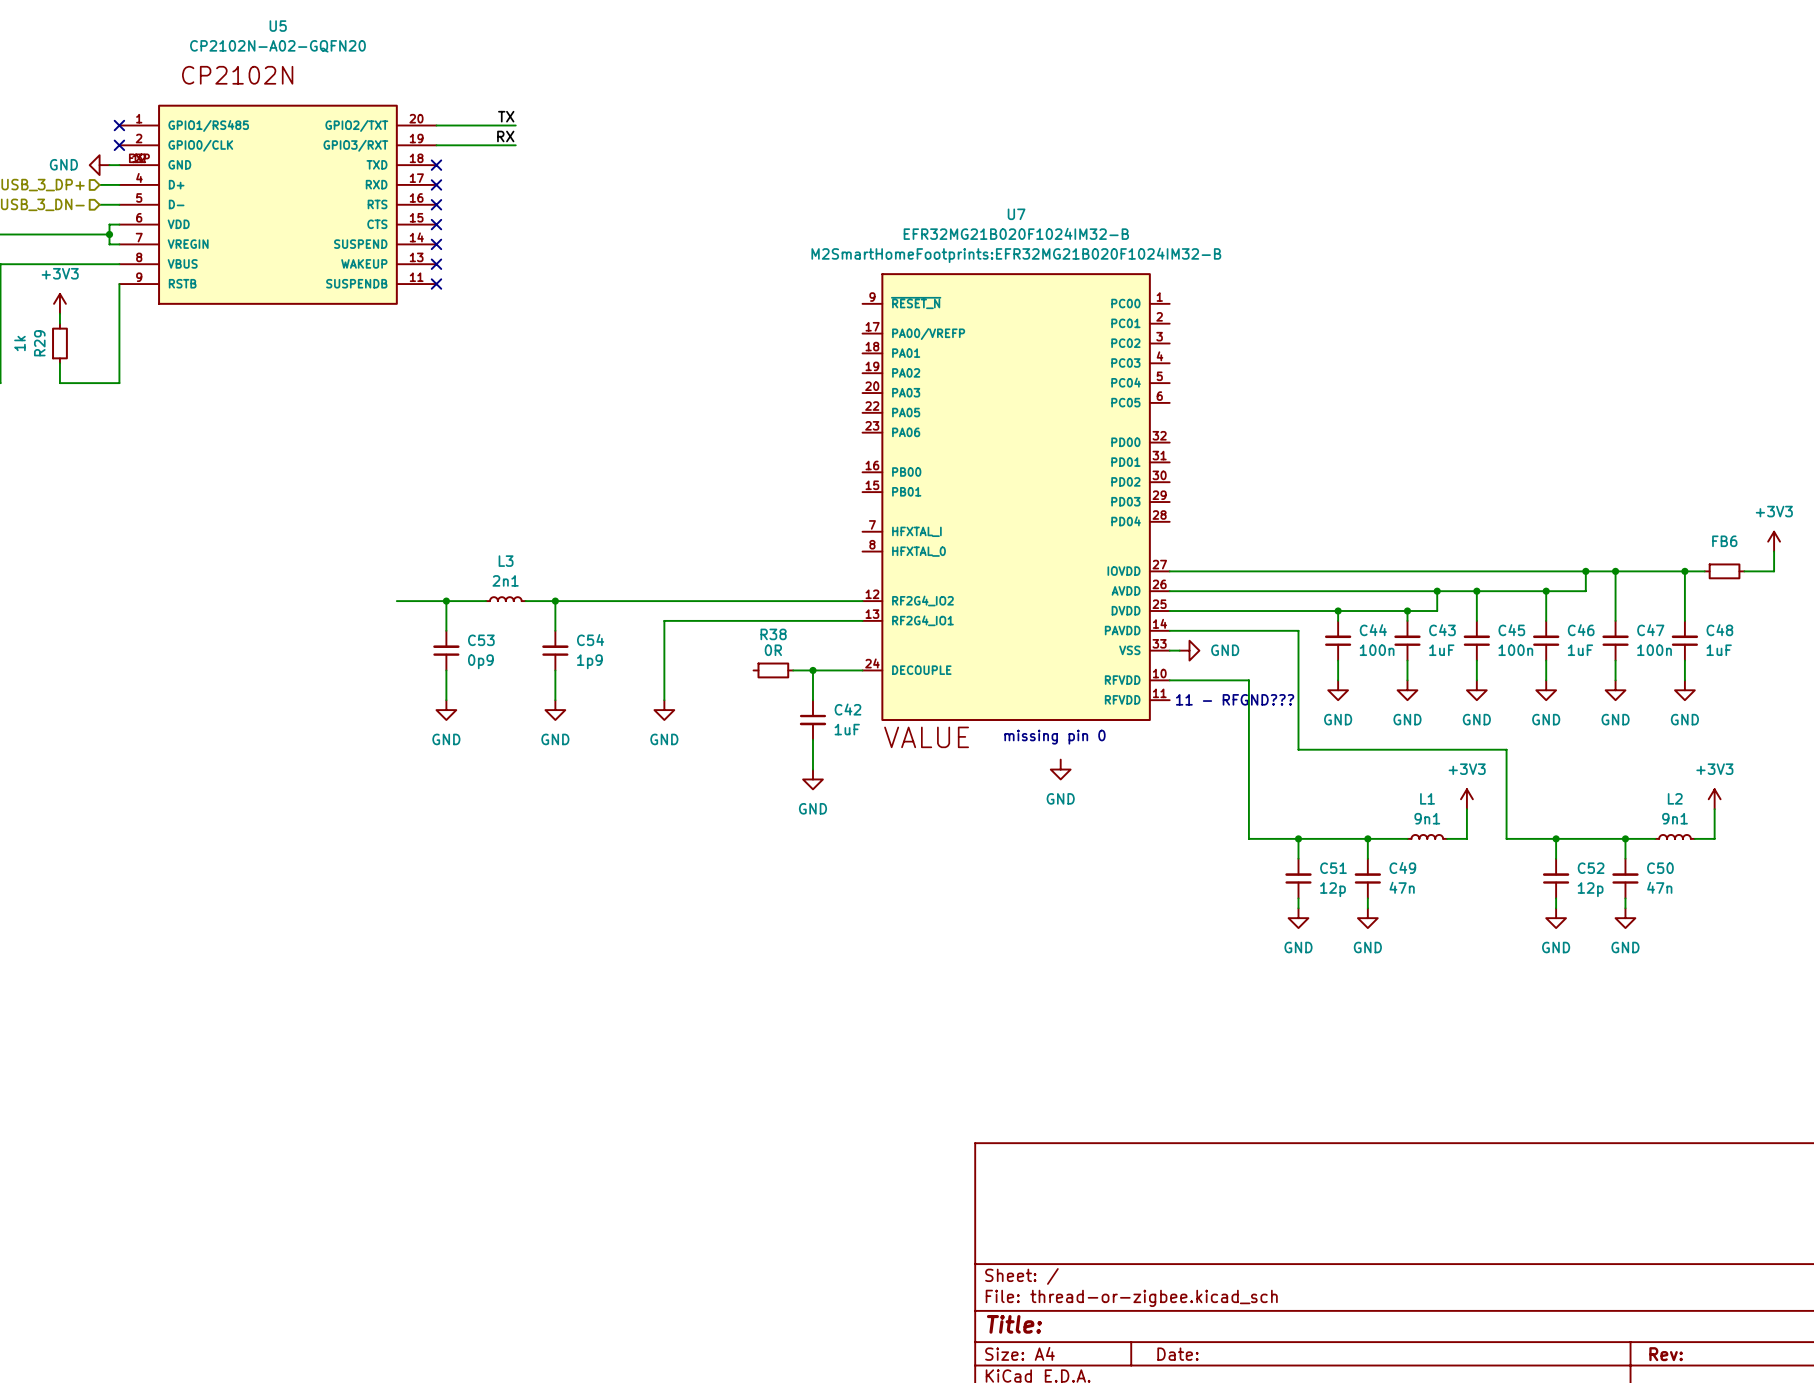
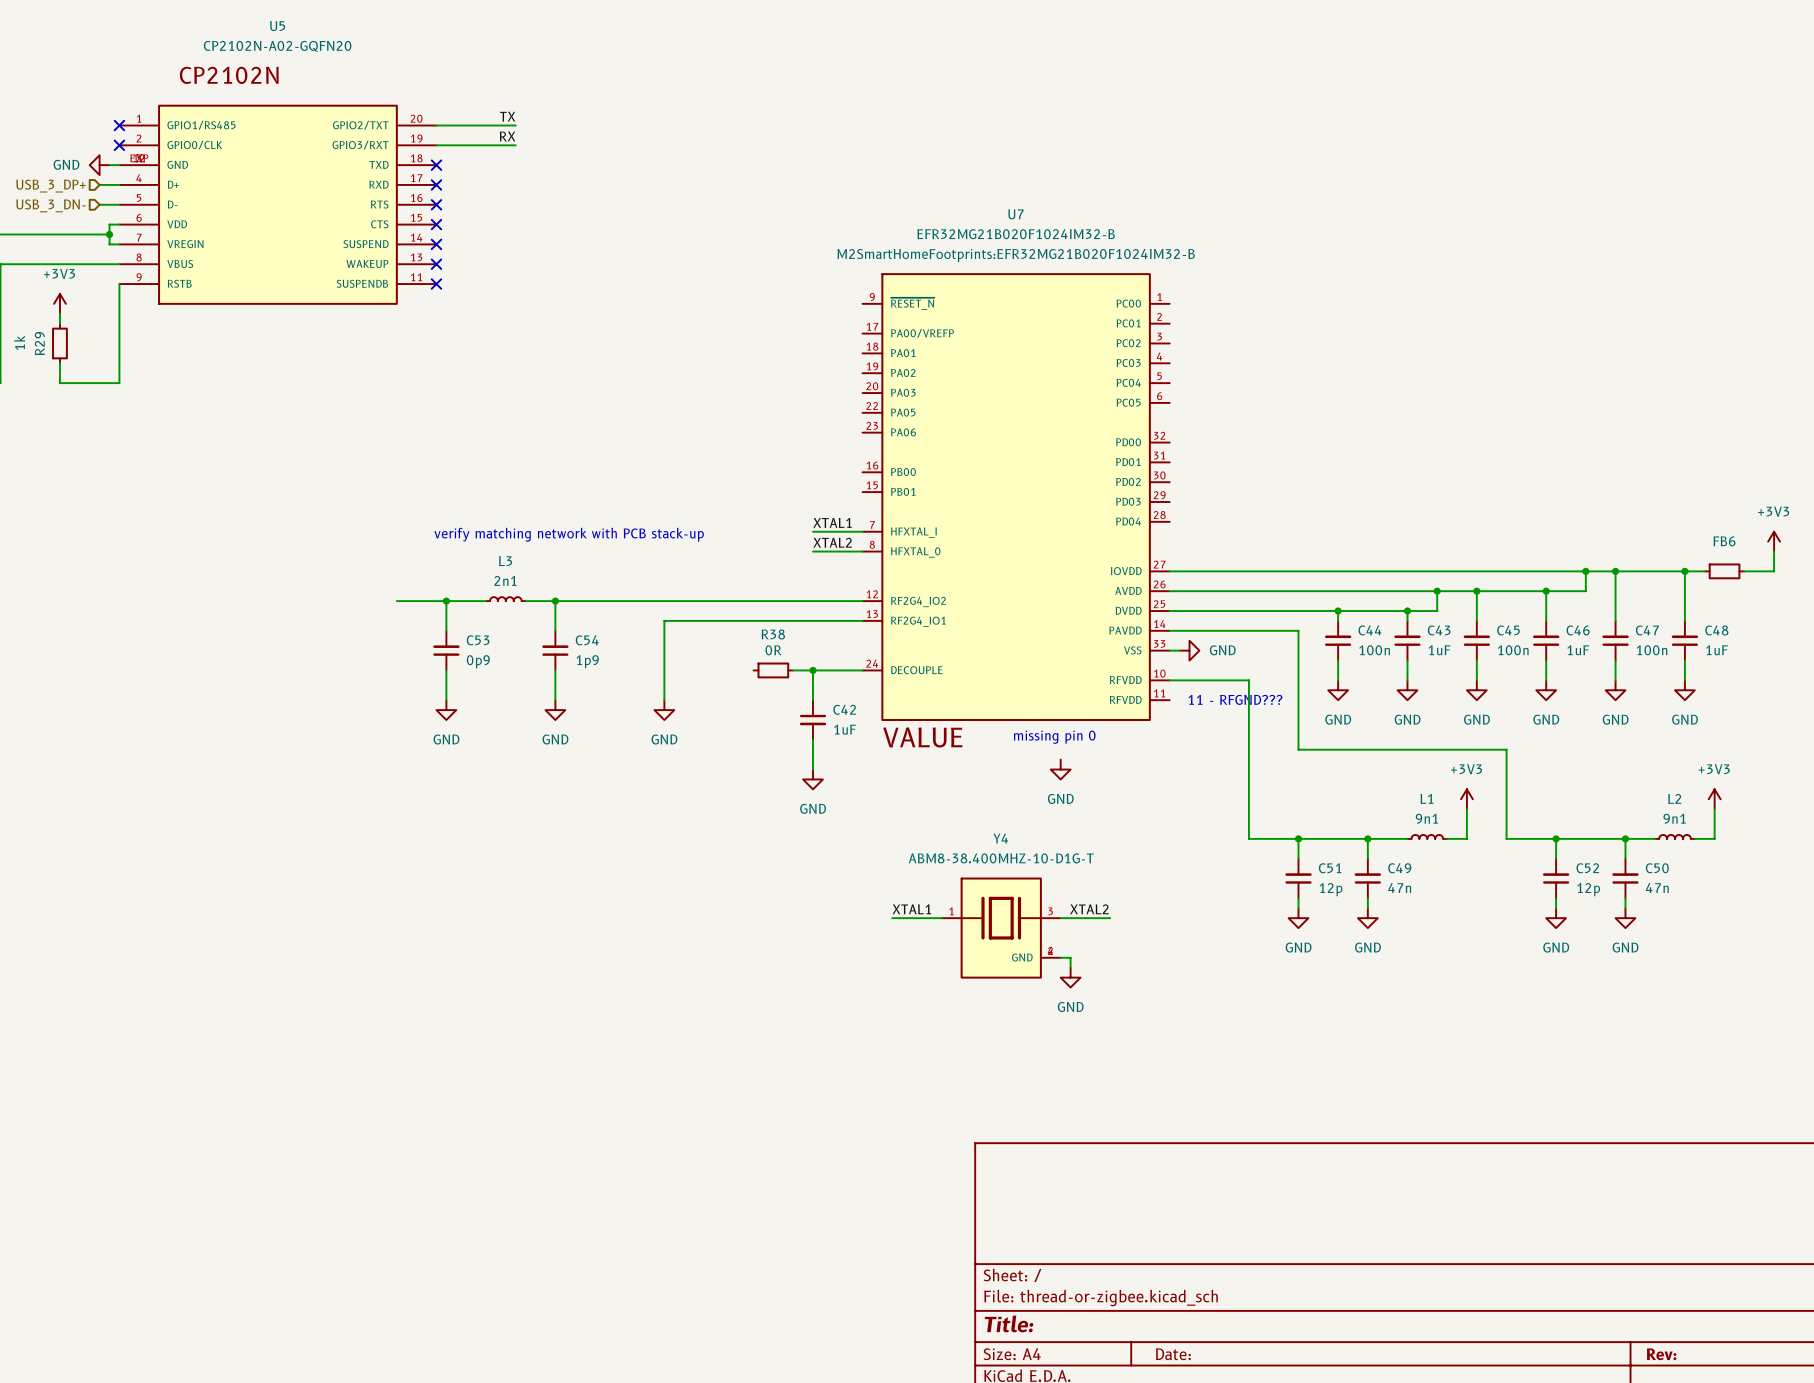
label: none -> XTAL1 (832, 522)
wire: none -> (812, 531) (862, 531)
text: none -> verify matching network with PCB stack-up (569, 534)
label: none -> XTAL2 (832, 542)
wire: none -> (812, 551) (862, 551)
label: none -> XTAL1 (911, 909)
label: none -> XTAL2 (1089, 909)
wire: none -> (892, 918) (941, 918)
wire: none -> (1060, 918) (1110, 918)
Y4: none -> ABM8-38.400MHZ-10-D1G-T (1001, 928)
wire: none -> (1060, 957) (1070, 957) (1070, 967)
power symbol: none -> GND (1070, 977)

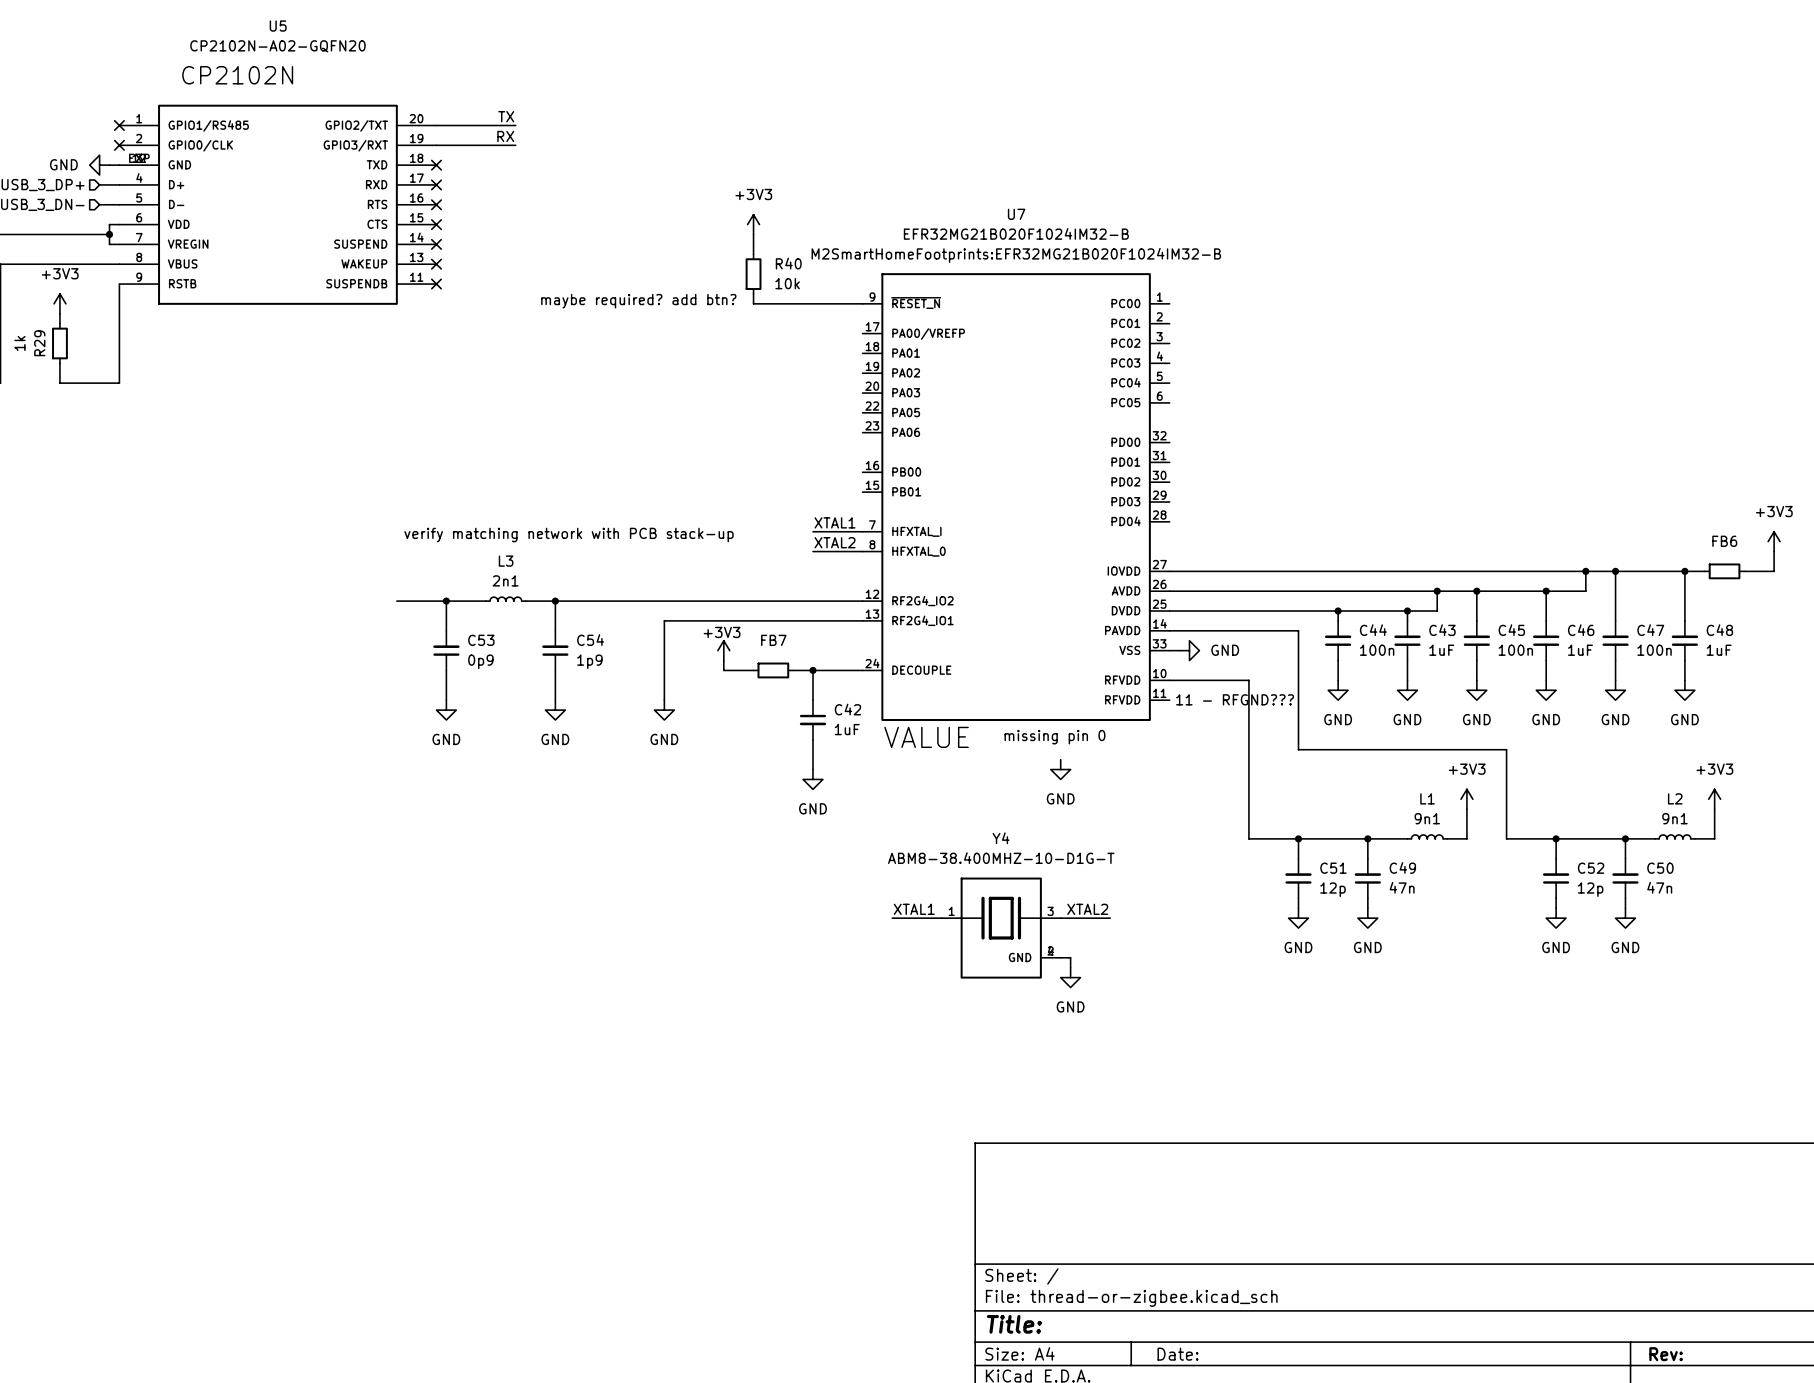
power symbol: none -> +3V3 (753, 224)
wire: none -> (753, 234) (753, 254)
R40: none -> (753, 274)
wire: none -> (753, 293) (753, 303) (862, 303)
text: none -> maybe required? add btn? (638, 301)
R38 name: R38 (773, 634) -> FB7 (773, 640)
power symbol: none -> +3V3 (723, 650)
R38 text: 0R (773, 650) -> none
wire: none -> (723, 660) (723, 670) (753, 670)

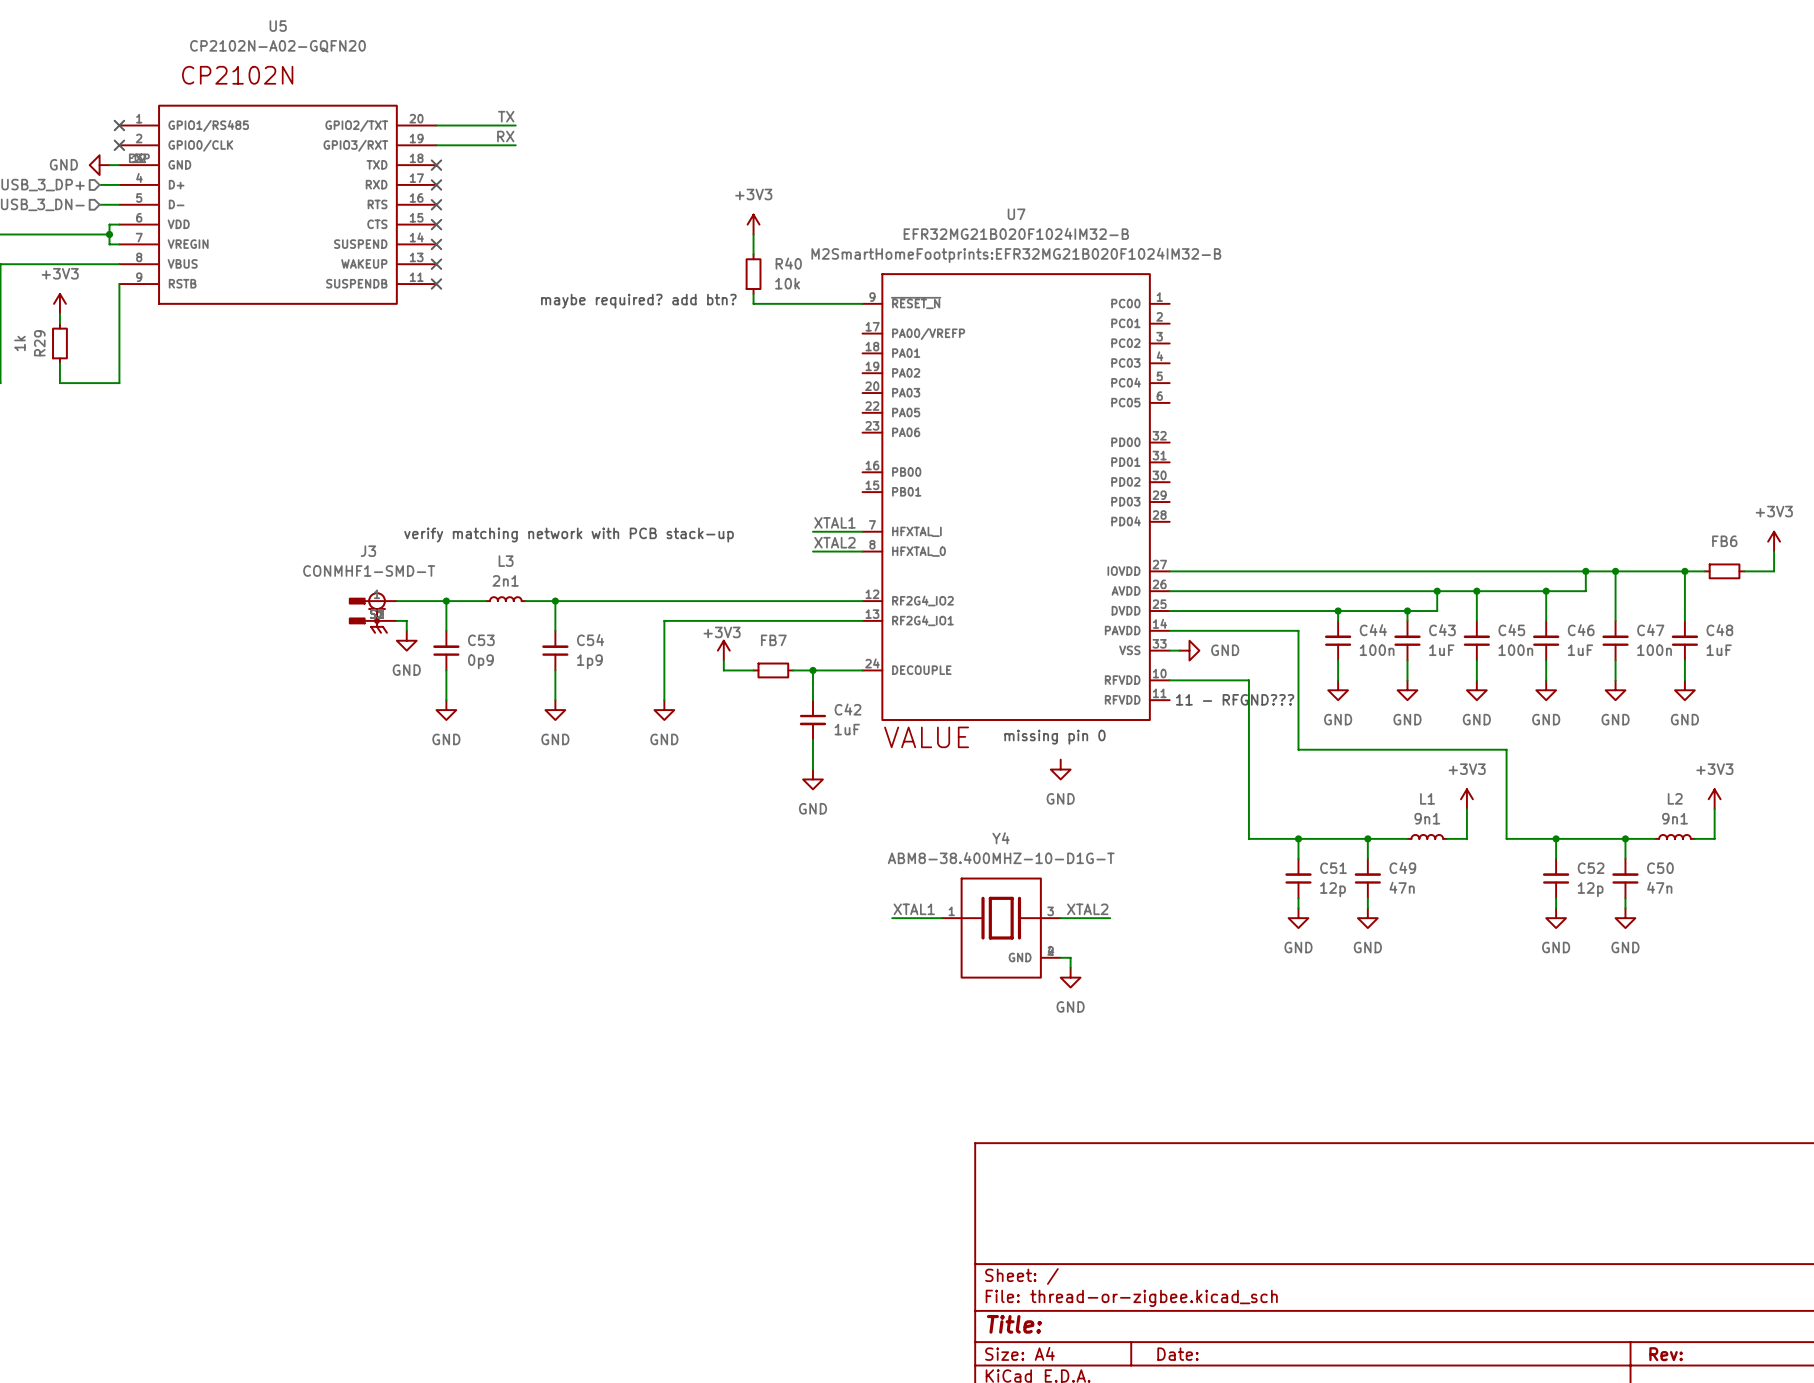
J3: none -> CONMHF1-SMD-T (373, 612)
wire: none -> (396, 620) (406, 620) (406, 630)
power symbol: none -> GND (406, 640)

